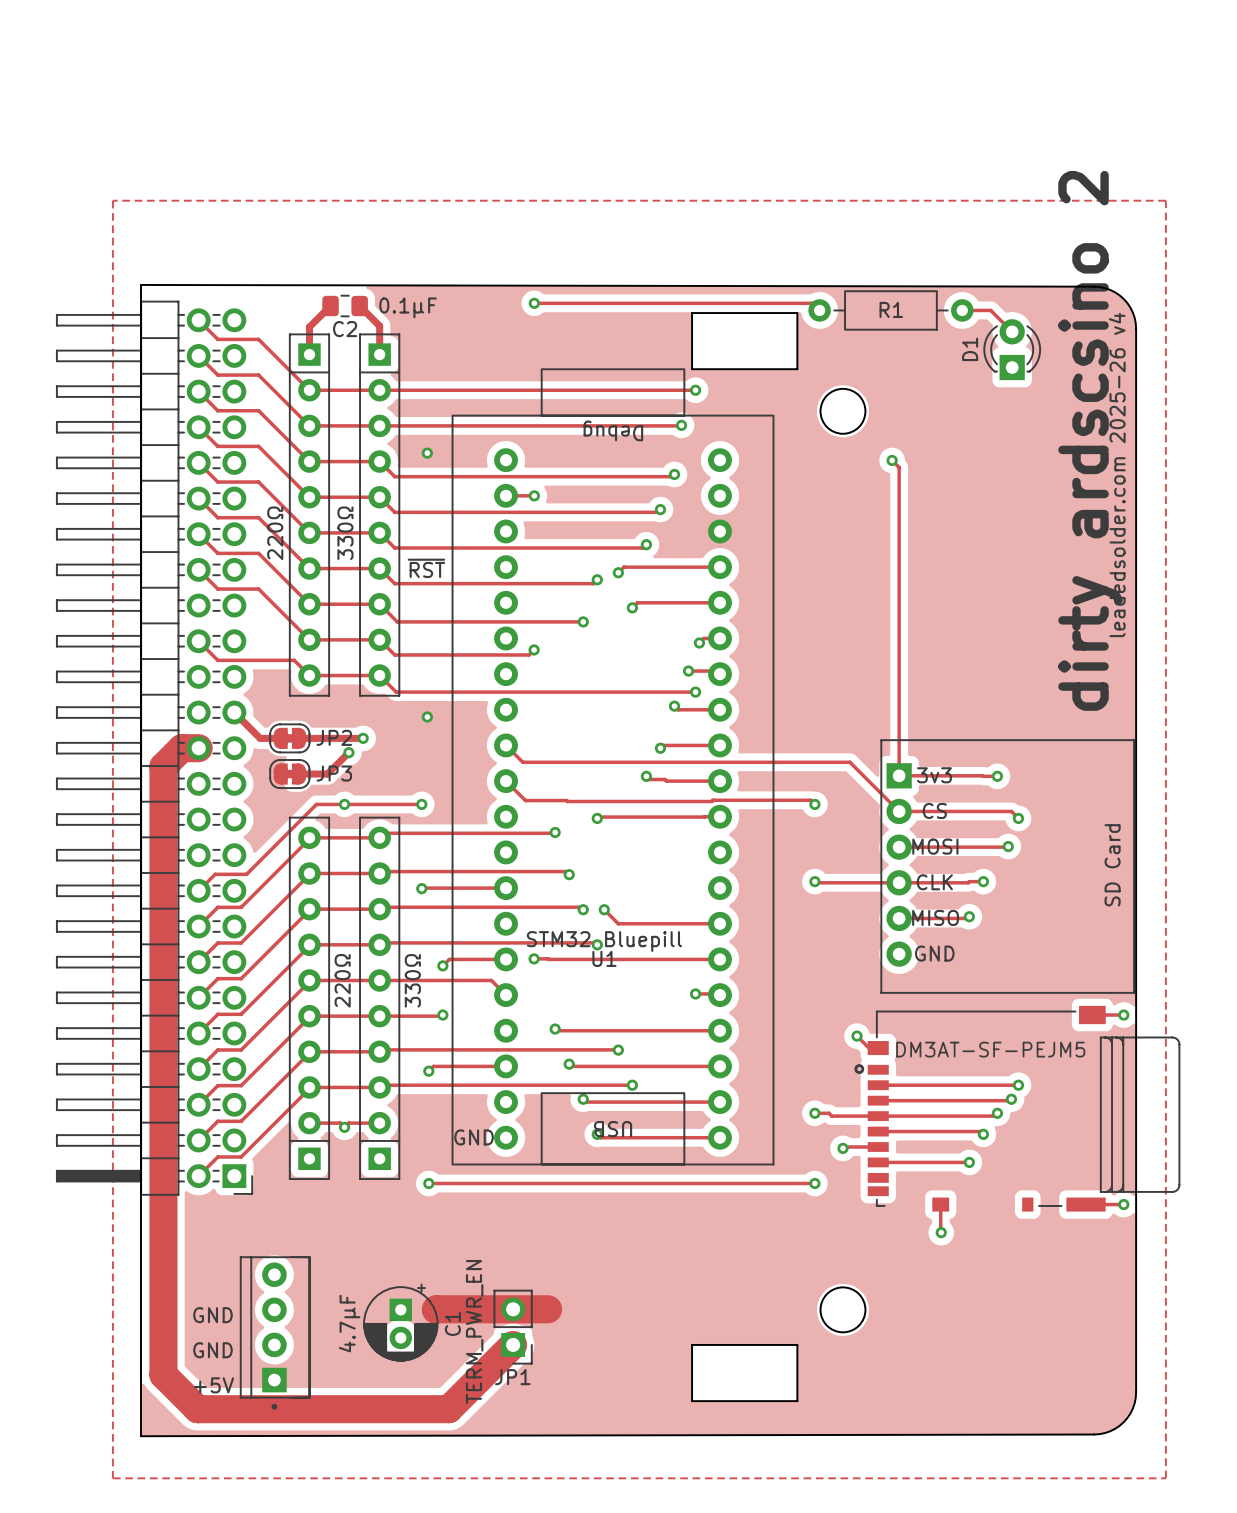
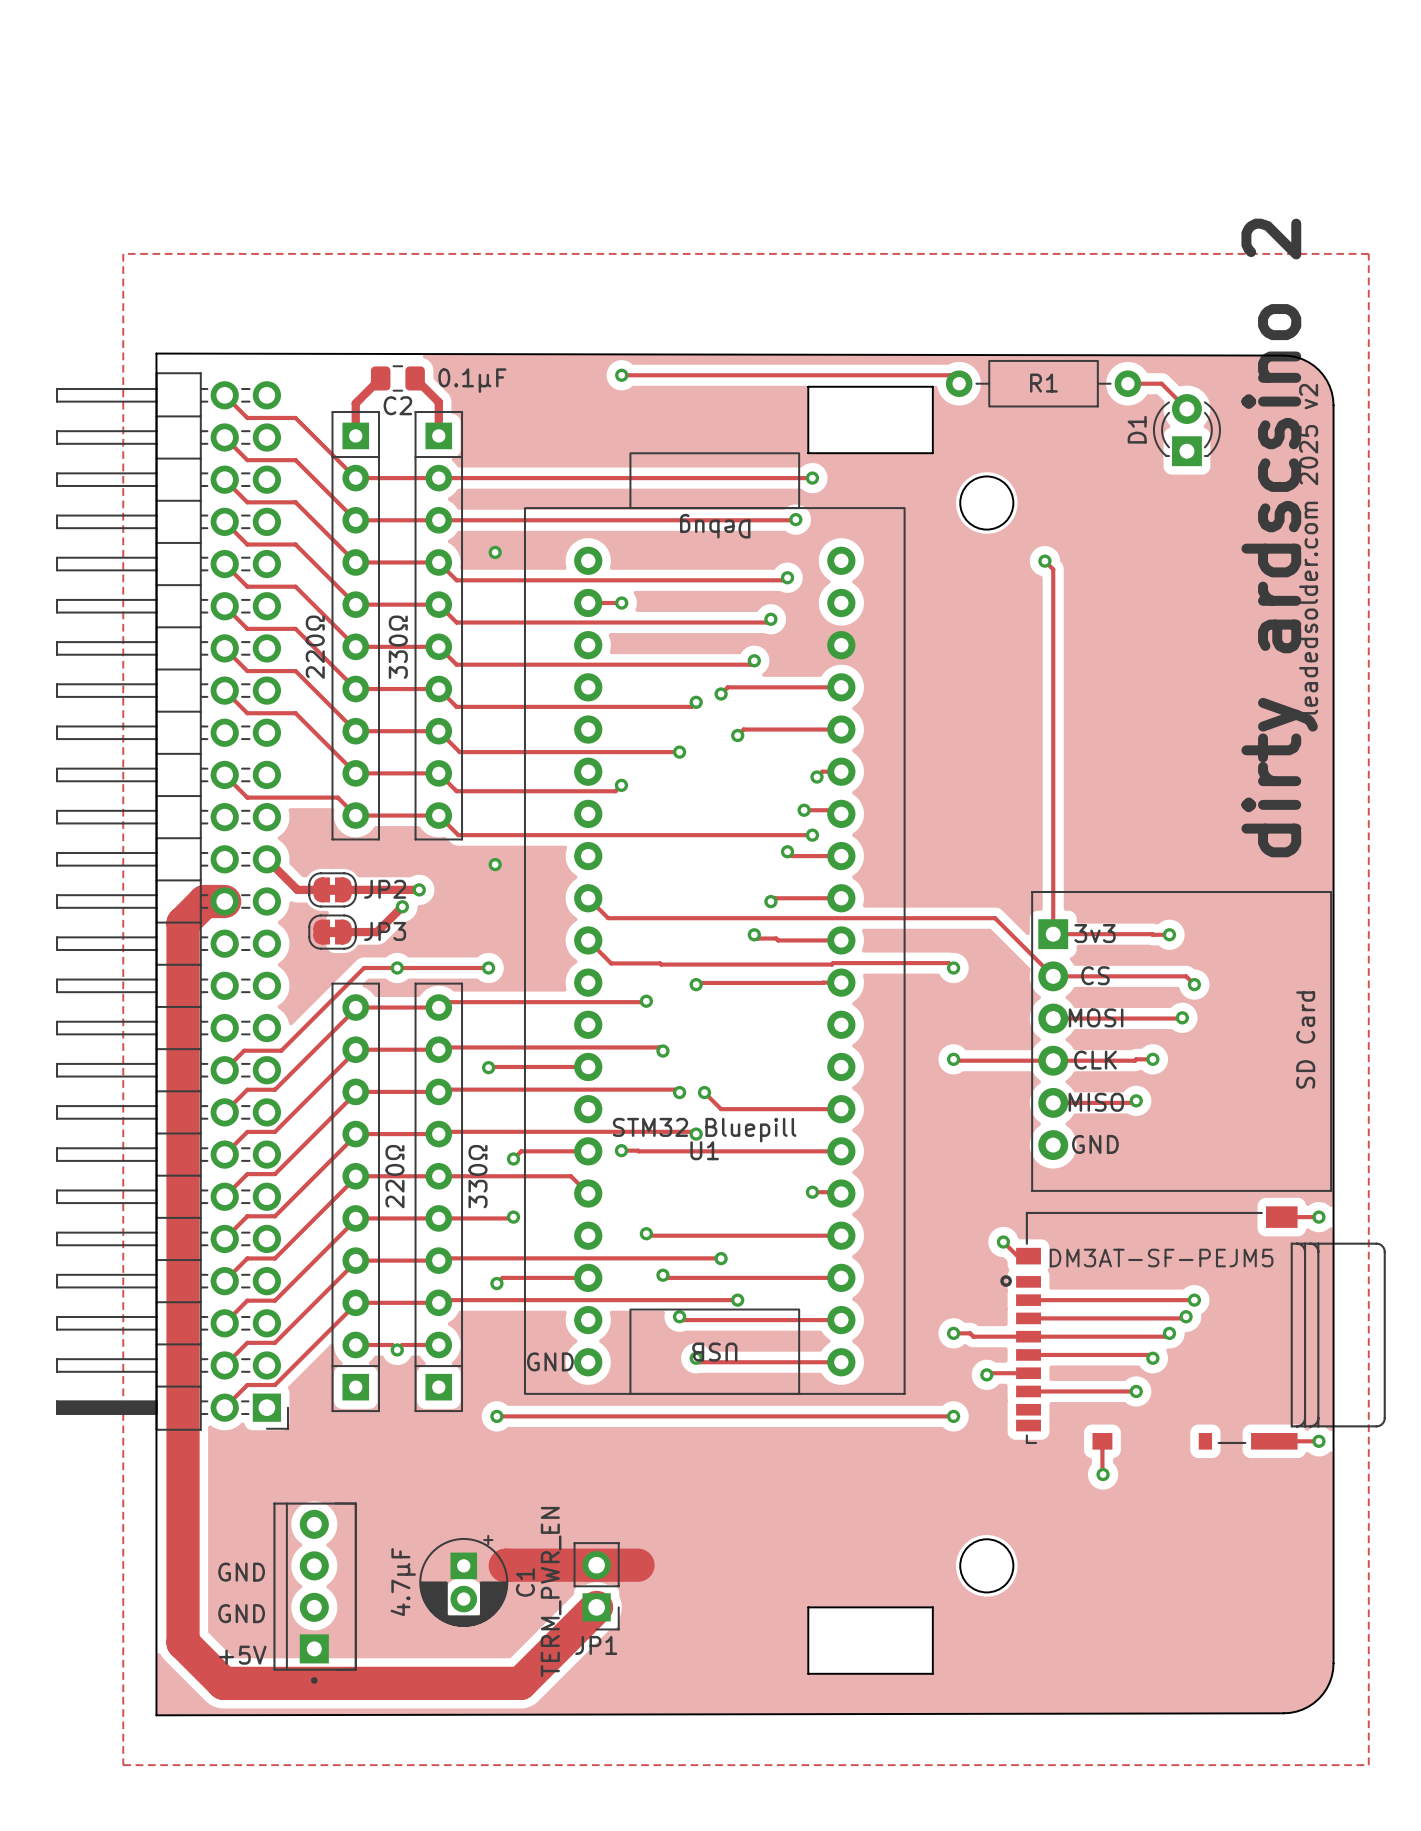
text: leadedsolder.com 2025-26 v4 (1117, 474) -> leadedsolder.com 2025 v2 (1308, 549)
text: ~{RST} (426, 568) -> none

